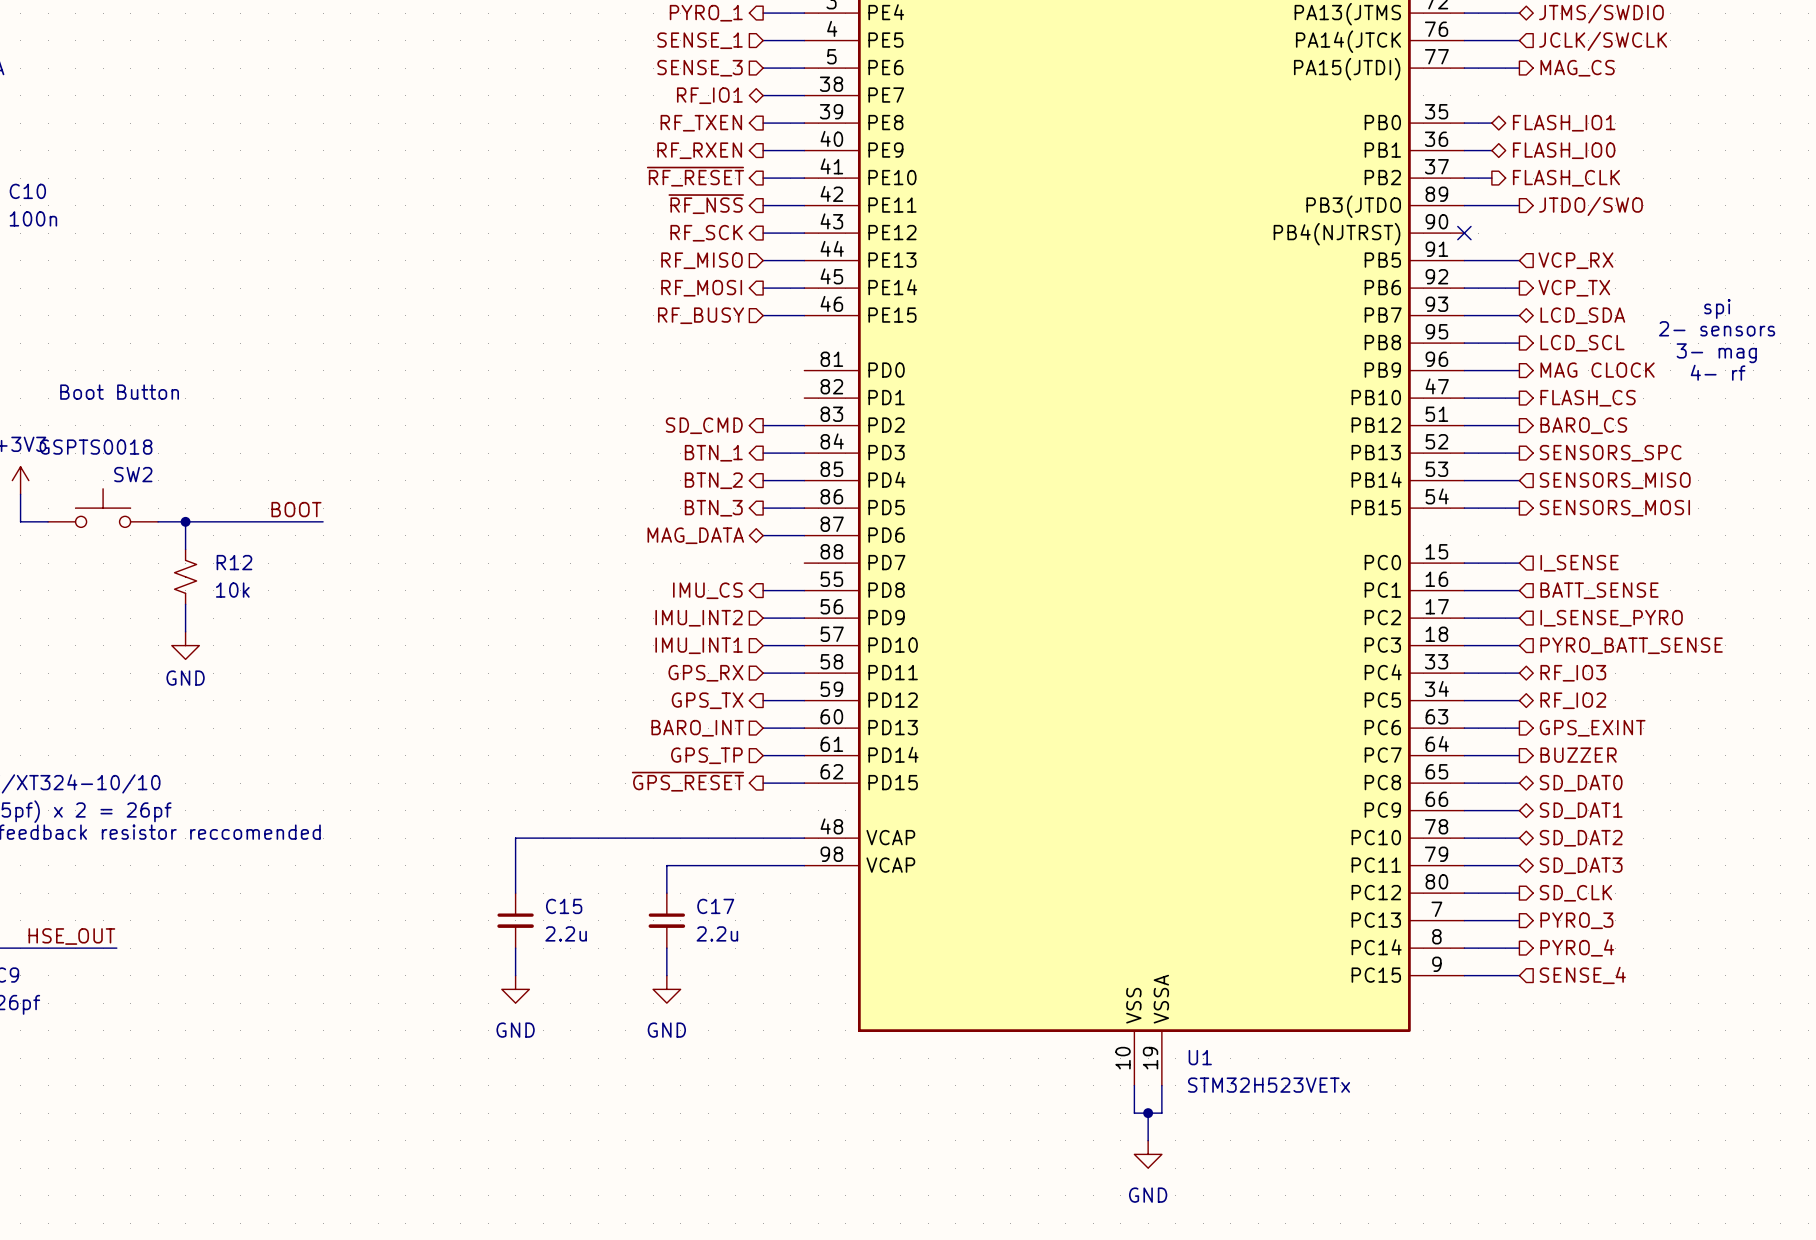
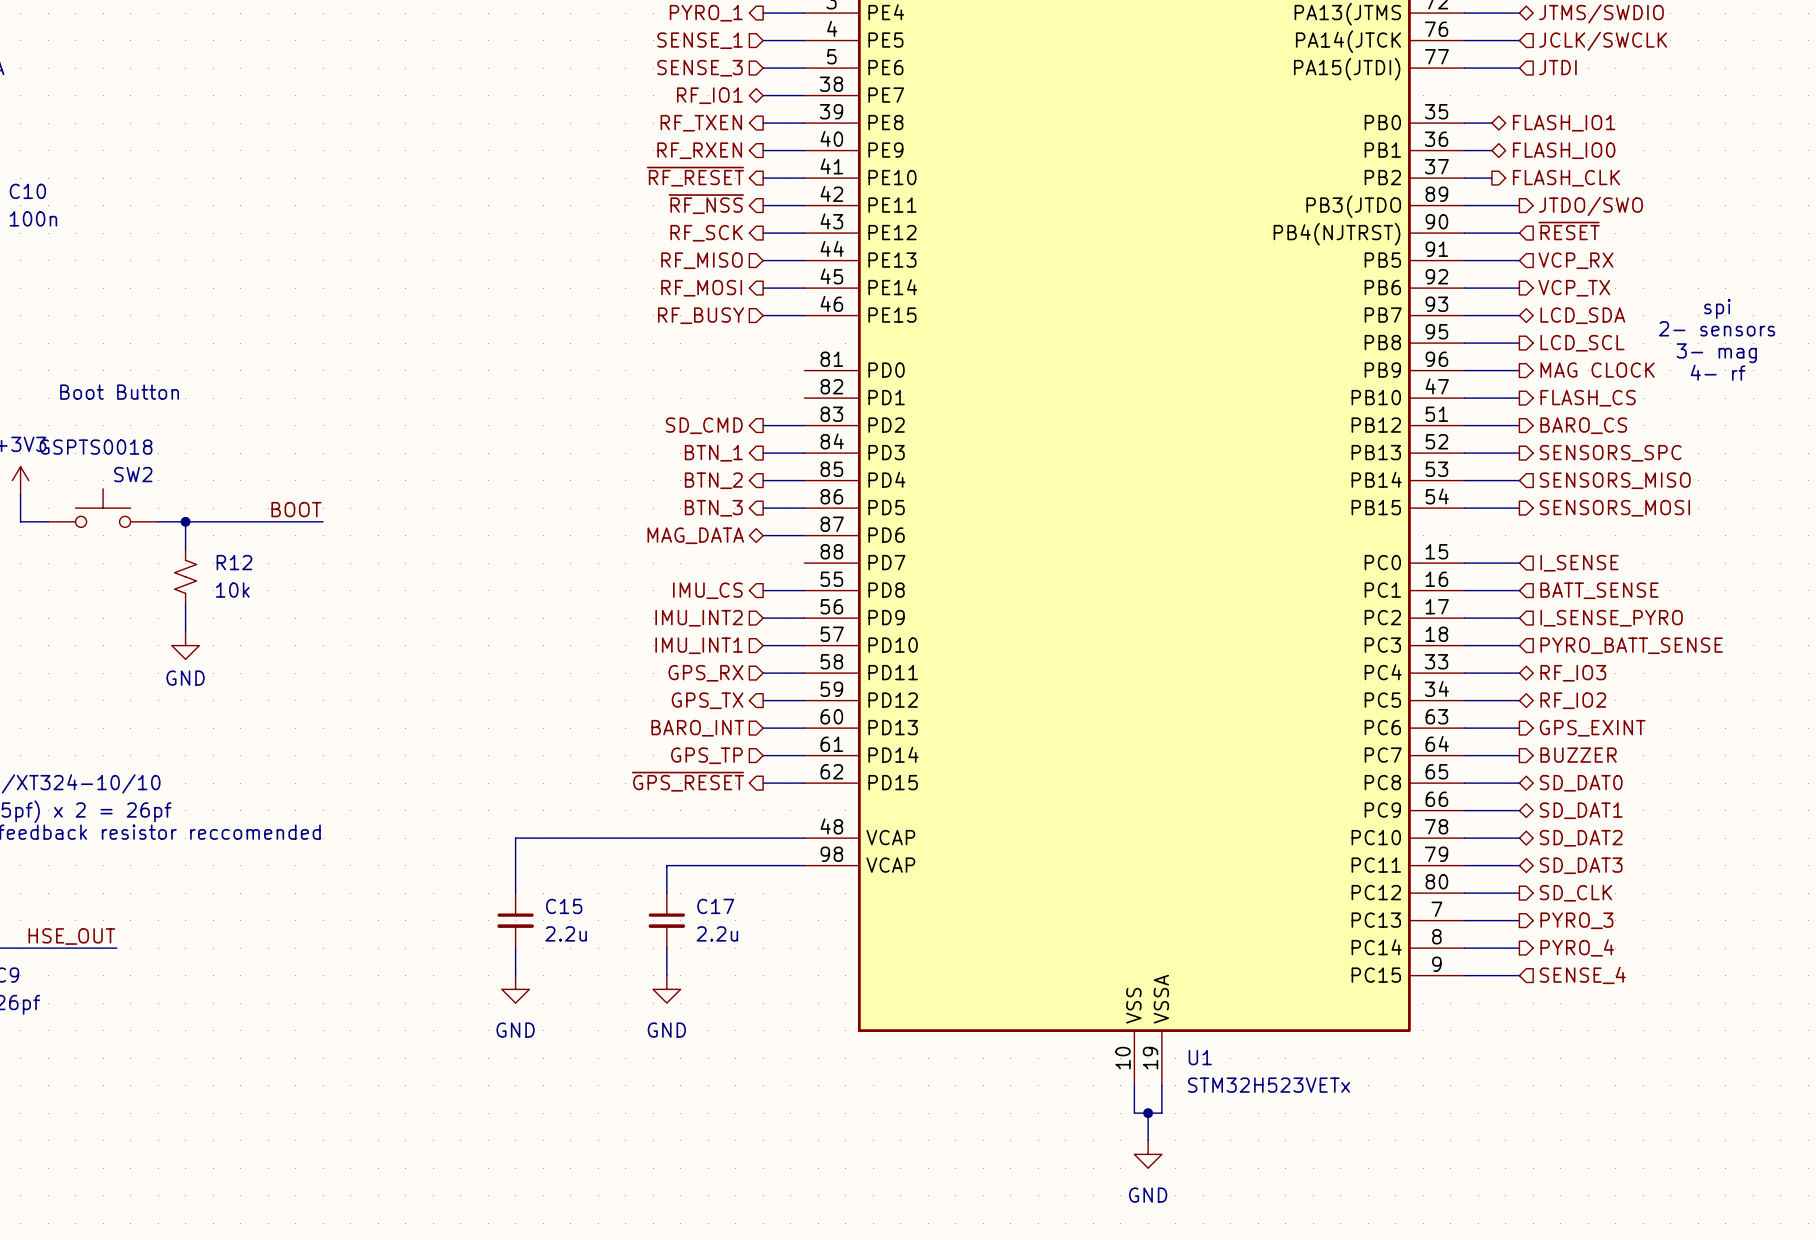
hierarchical label shape: output (1577, 68) -> input (1557, 67)
hierarchical label: MAG_CS (1577, 68) -> JTDI (1557, 67)
hierarchical label: none -> ~{RESET} (1569, 230)
wire: none -> (1464, 233) (1519, 233)
no-connect mark: (1464, 233) -> none

